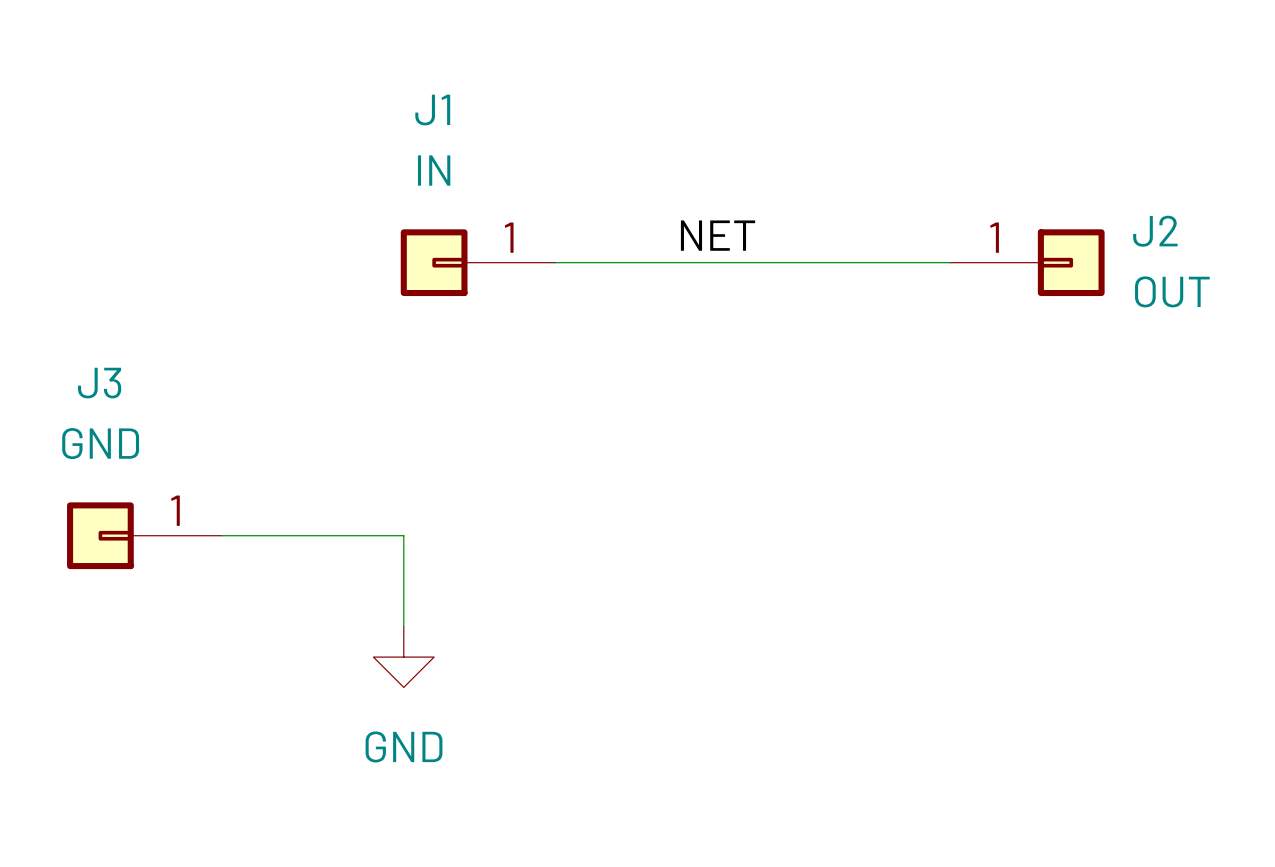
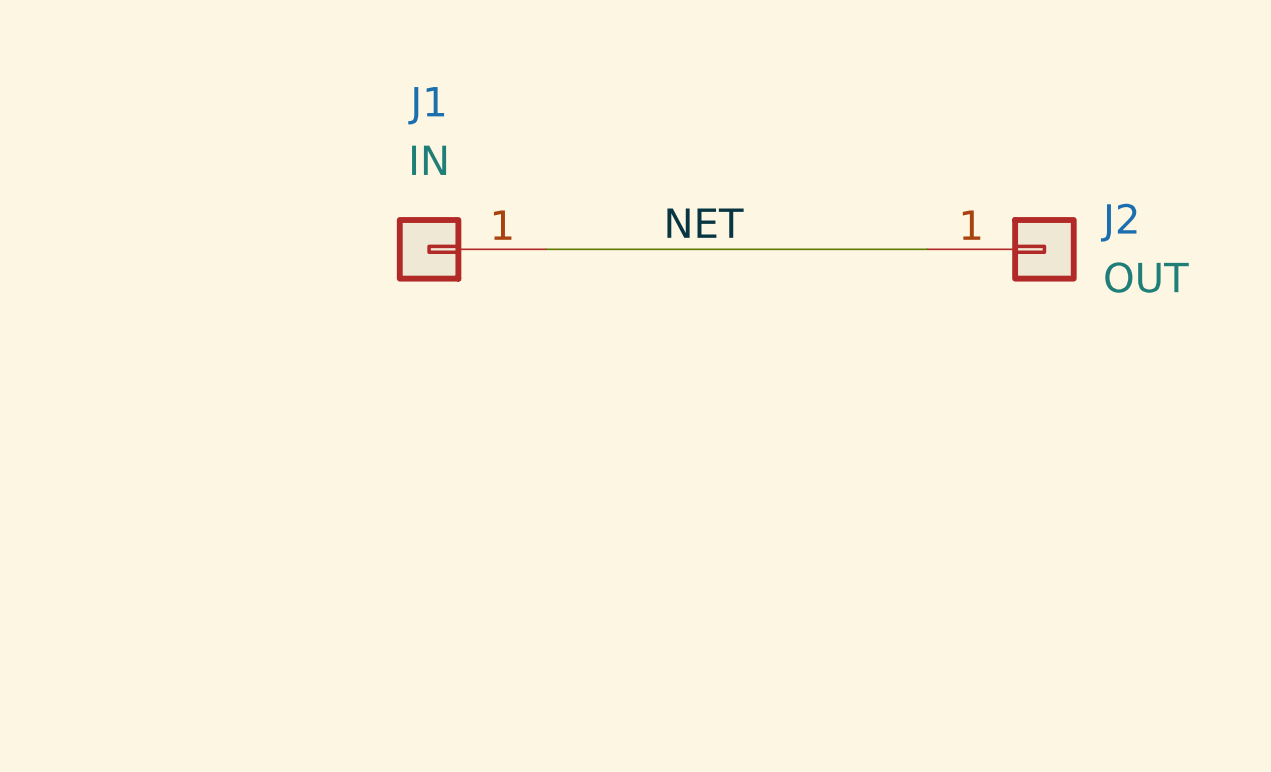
J3: GND (144, 535) -> none
wire: (221, 535) (403, 535) (403, 626) -> none
power symbol: GND (403, 657) -> none

